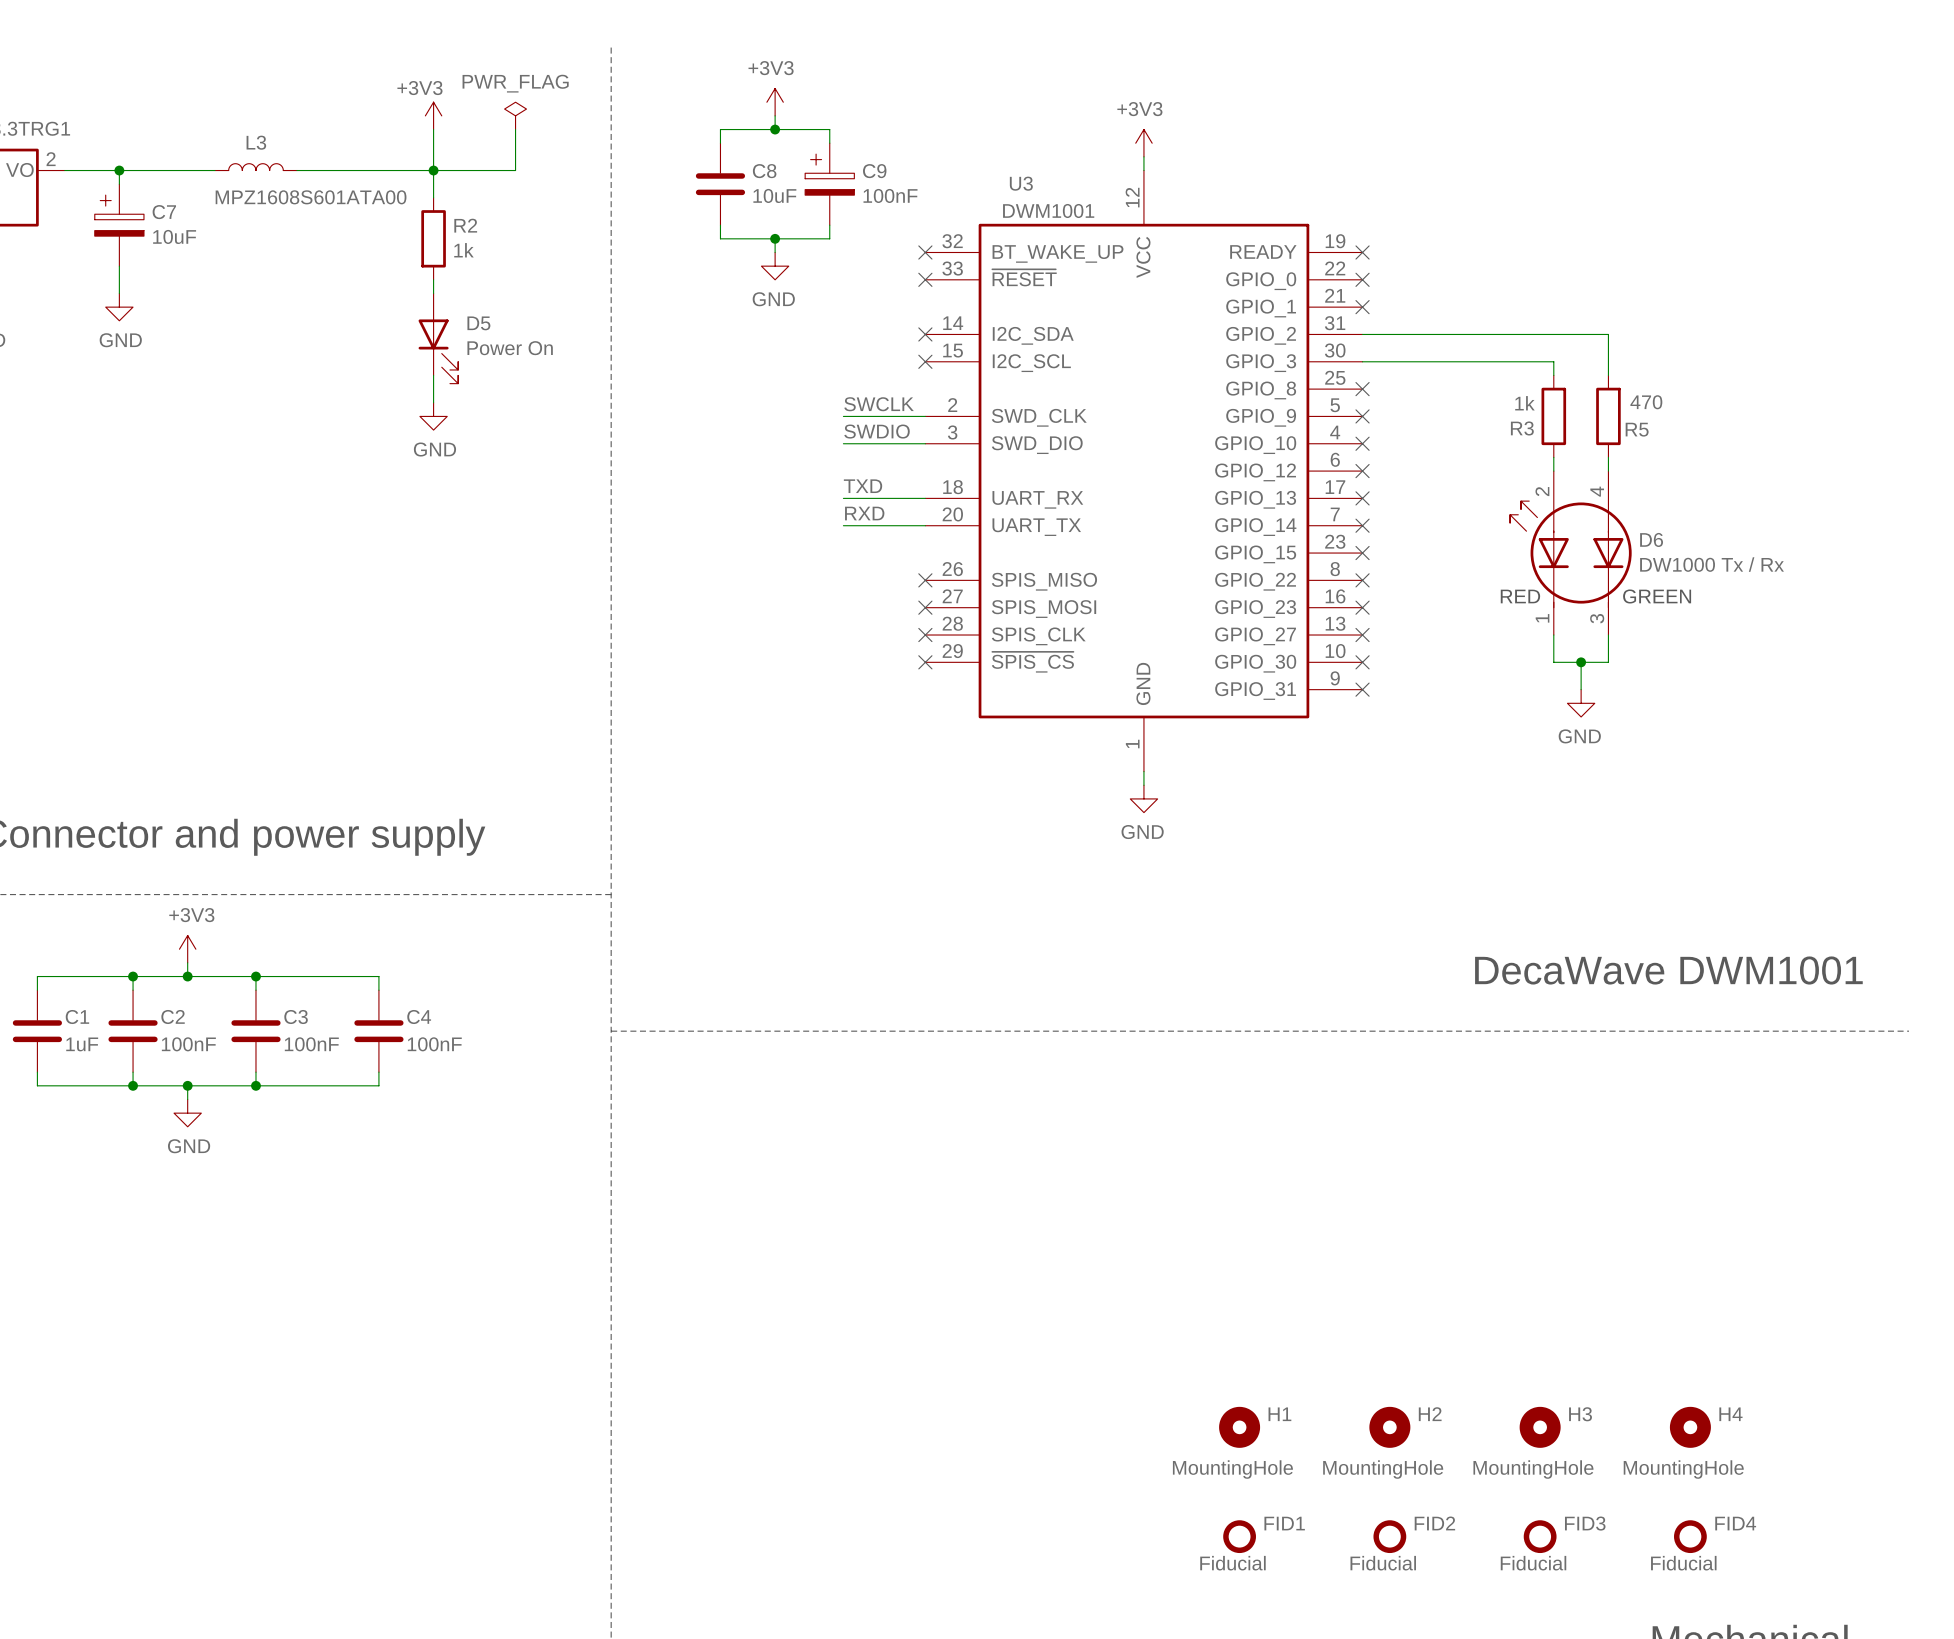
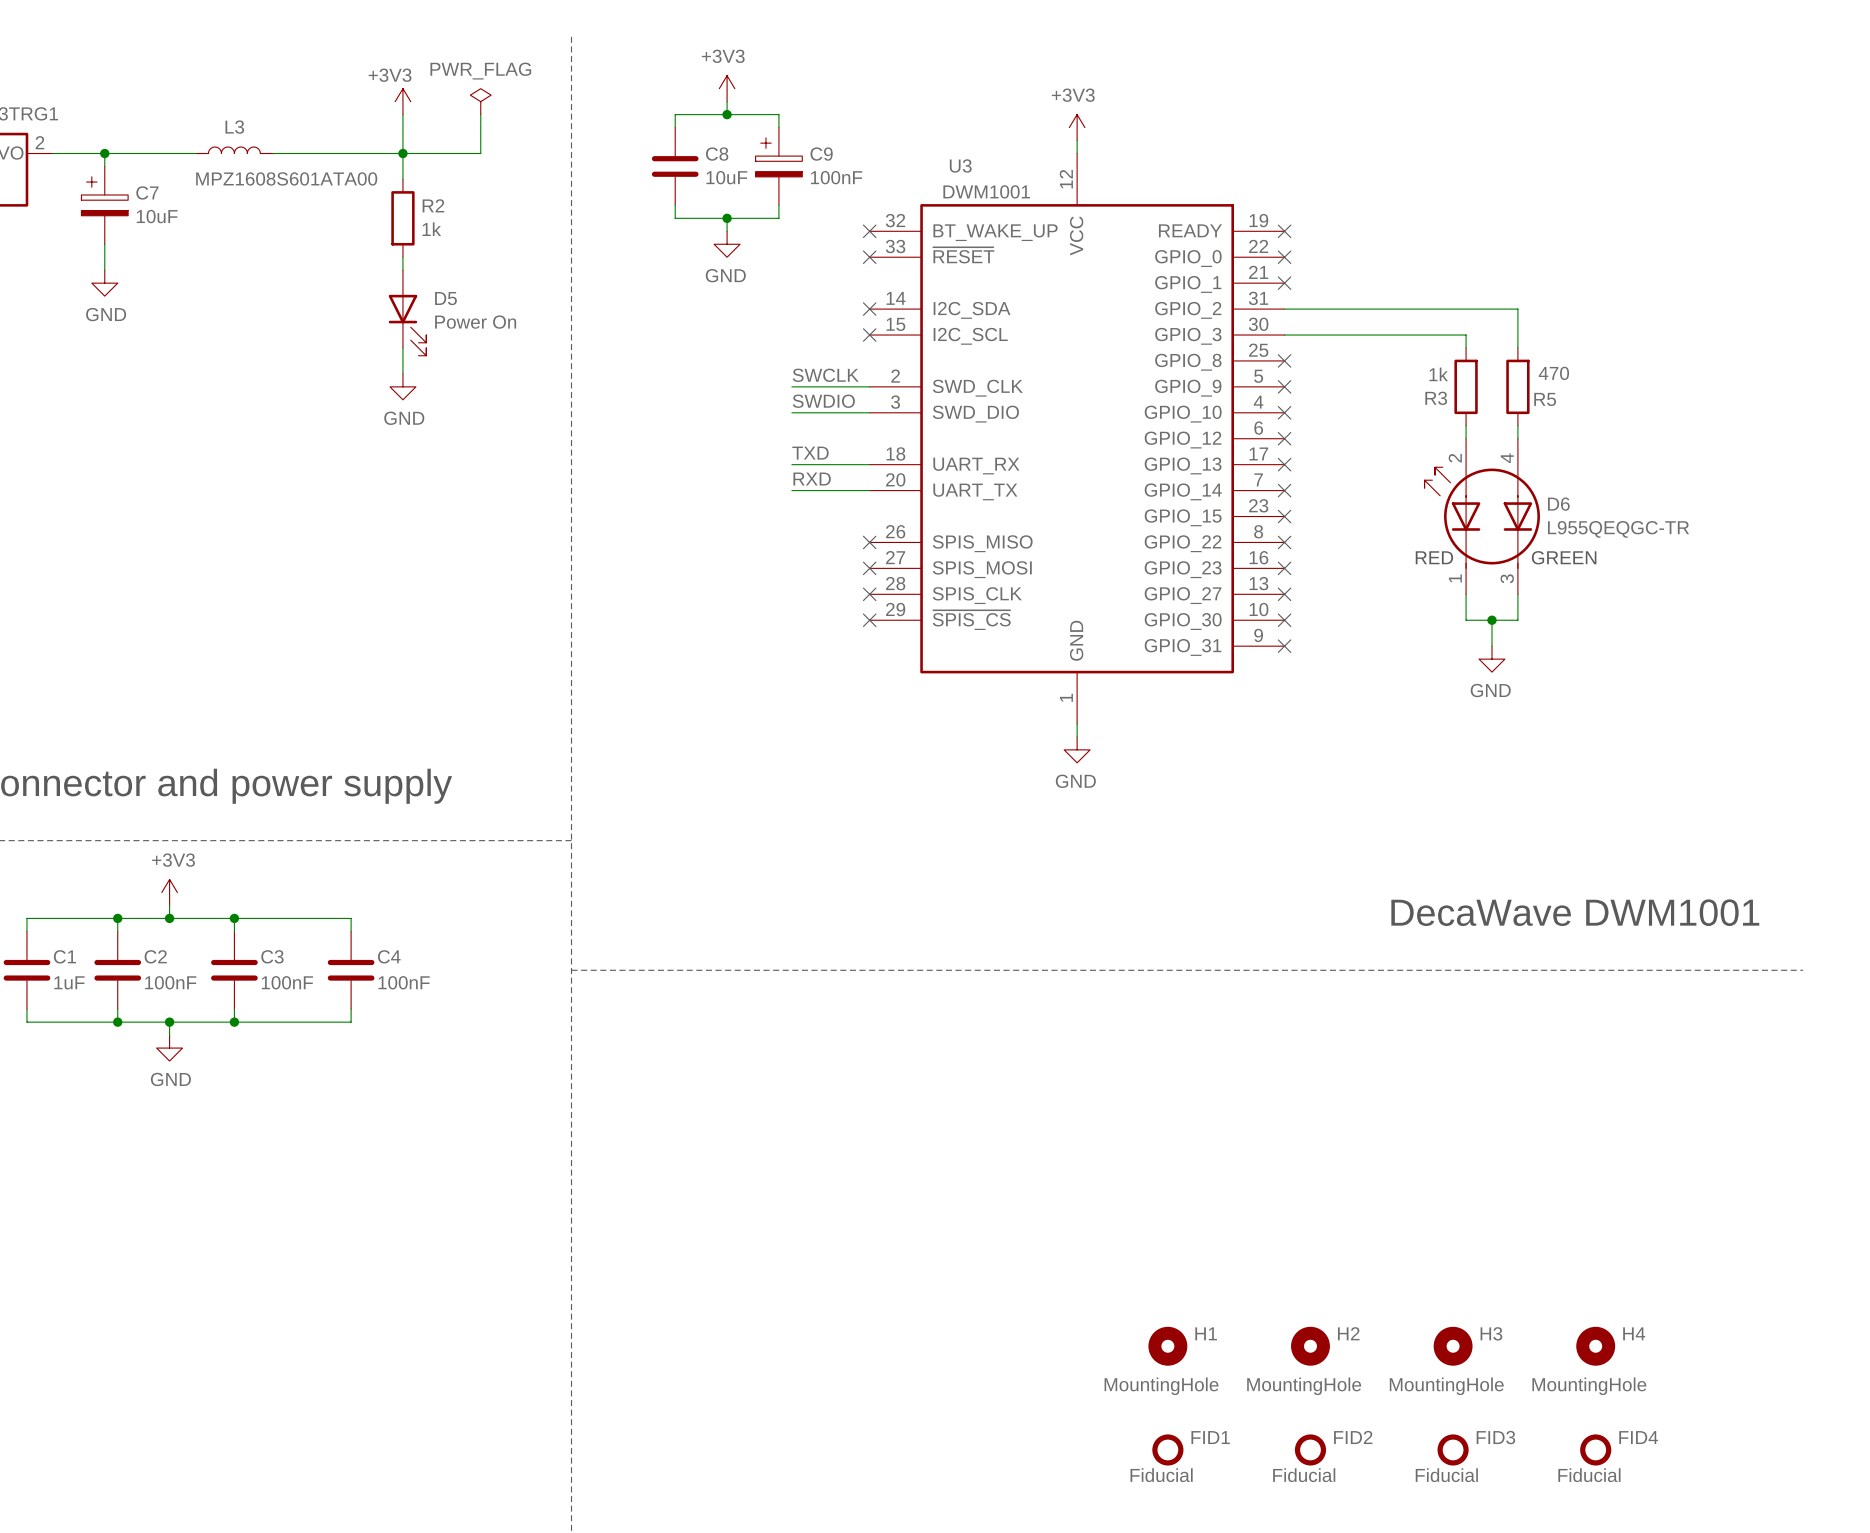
D6 value: DW1000 Tx / Rx (1712, 564) -> L955QEQGC-TR (1618, 529)

